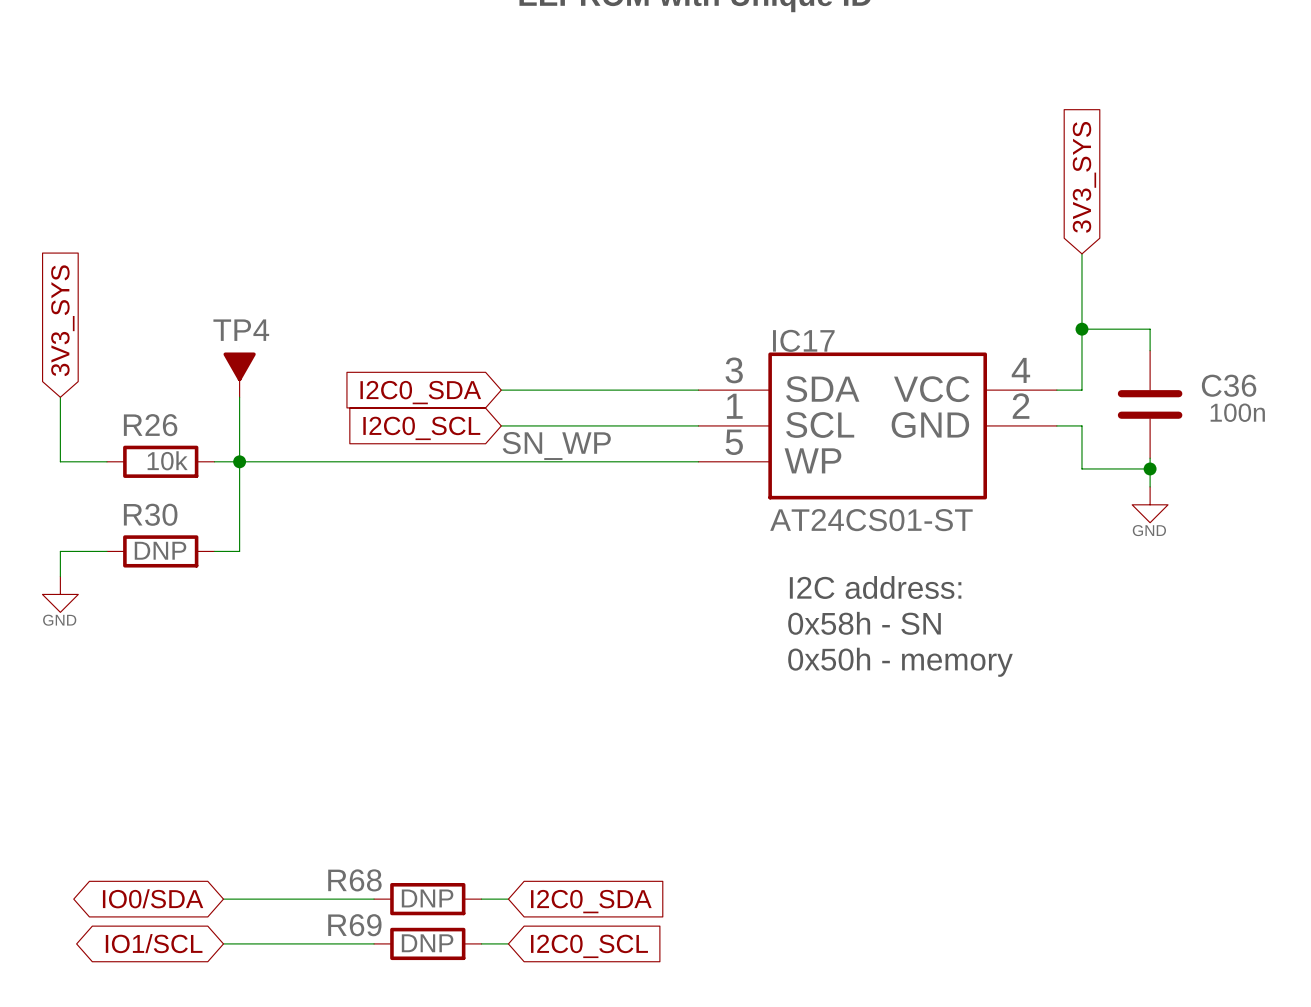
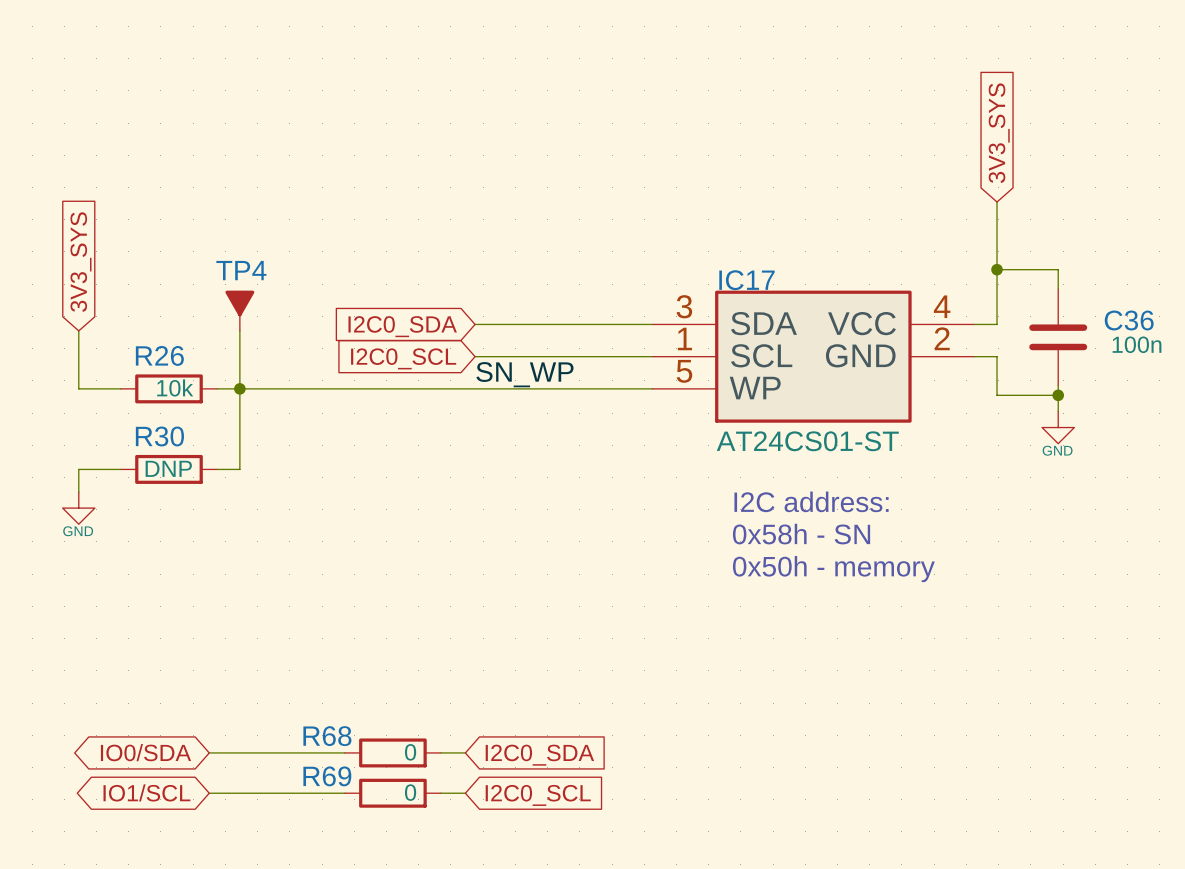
global label position: IO0/SDA (153, 898) -> IO0/SDA (146, 752)
R68 text: DNP (427, 898) -> 0 (410, 752)
wire: (223, 899) (374, 899) -> (209, 752) (344, 752)
R68 position: (427, 899) -> (392, 752)
wire: (481, 899) (508, 899) -> (441, 752) (465, 752)
global label position: I2C0_SDA (591, 901) -> I2C0_SDA (539, 755)
global label position: IO1/SCL (154, 943) -> IO1/SCL (146, 792)
wire: (223, 943) (374, 943) -> (209, 793) (344, 793)
R69 position: (427, 943) -> (392, 793)
R69 text: DNP (427, 943) -> 0 (410, 792)
wire: (481, 943) (508, 943) -> (441, 793) (465, 793)
global label position: I2C0_SCL (589, 946) -> I2C0_SCL (538, 795)

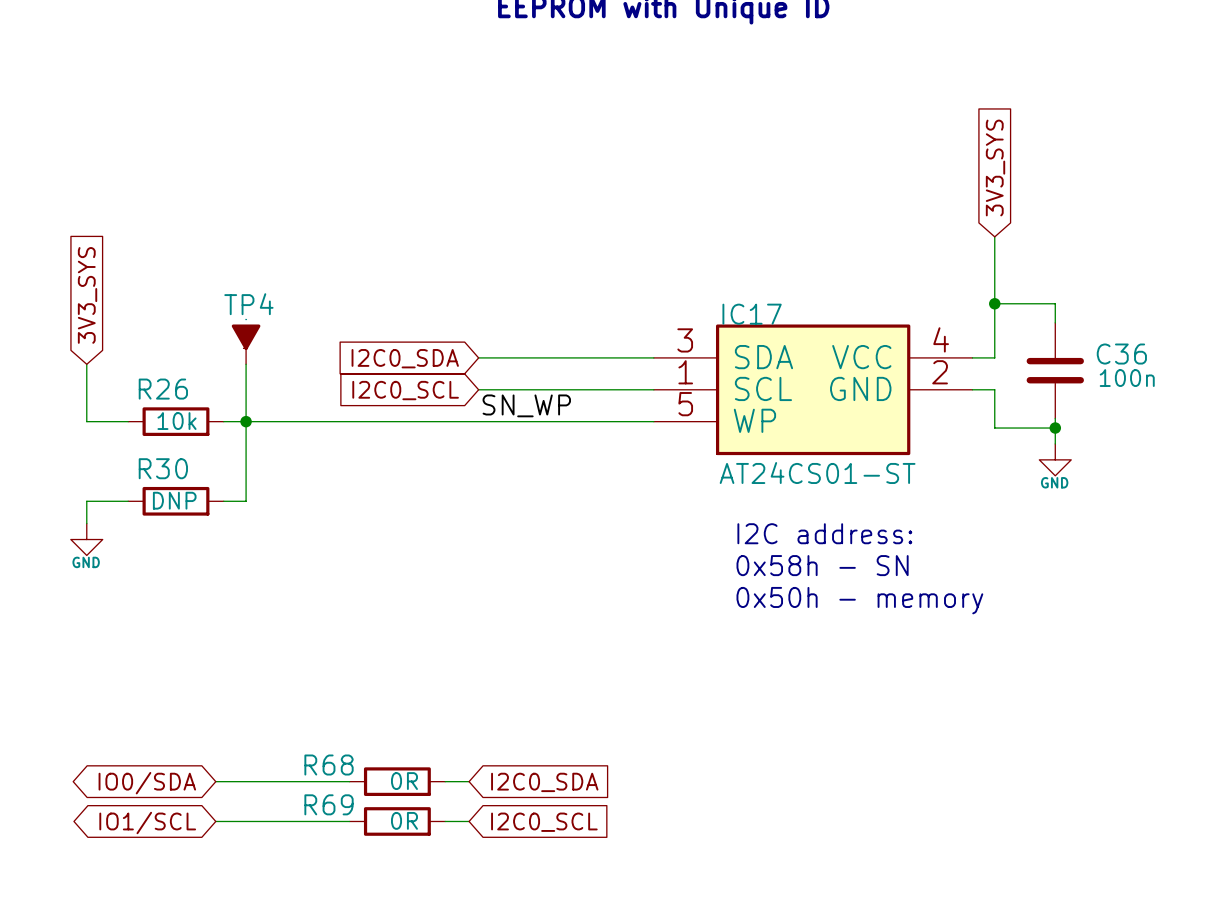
R68 text: 0 (410, 752) -> 0R (404, 781)
R69 text: 0 (410, 792) -> 0R (404, 820)

